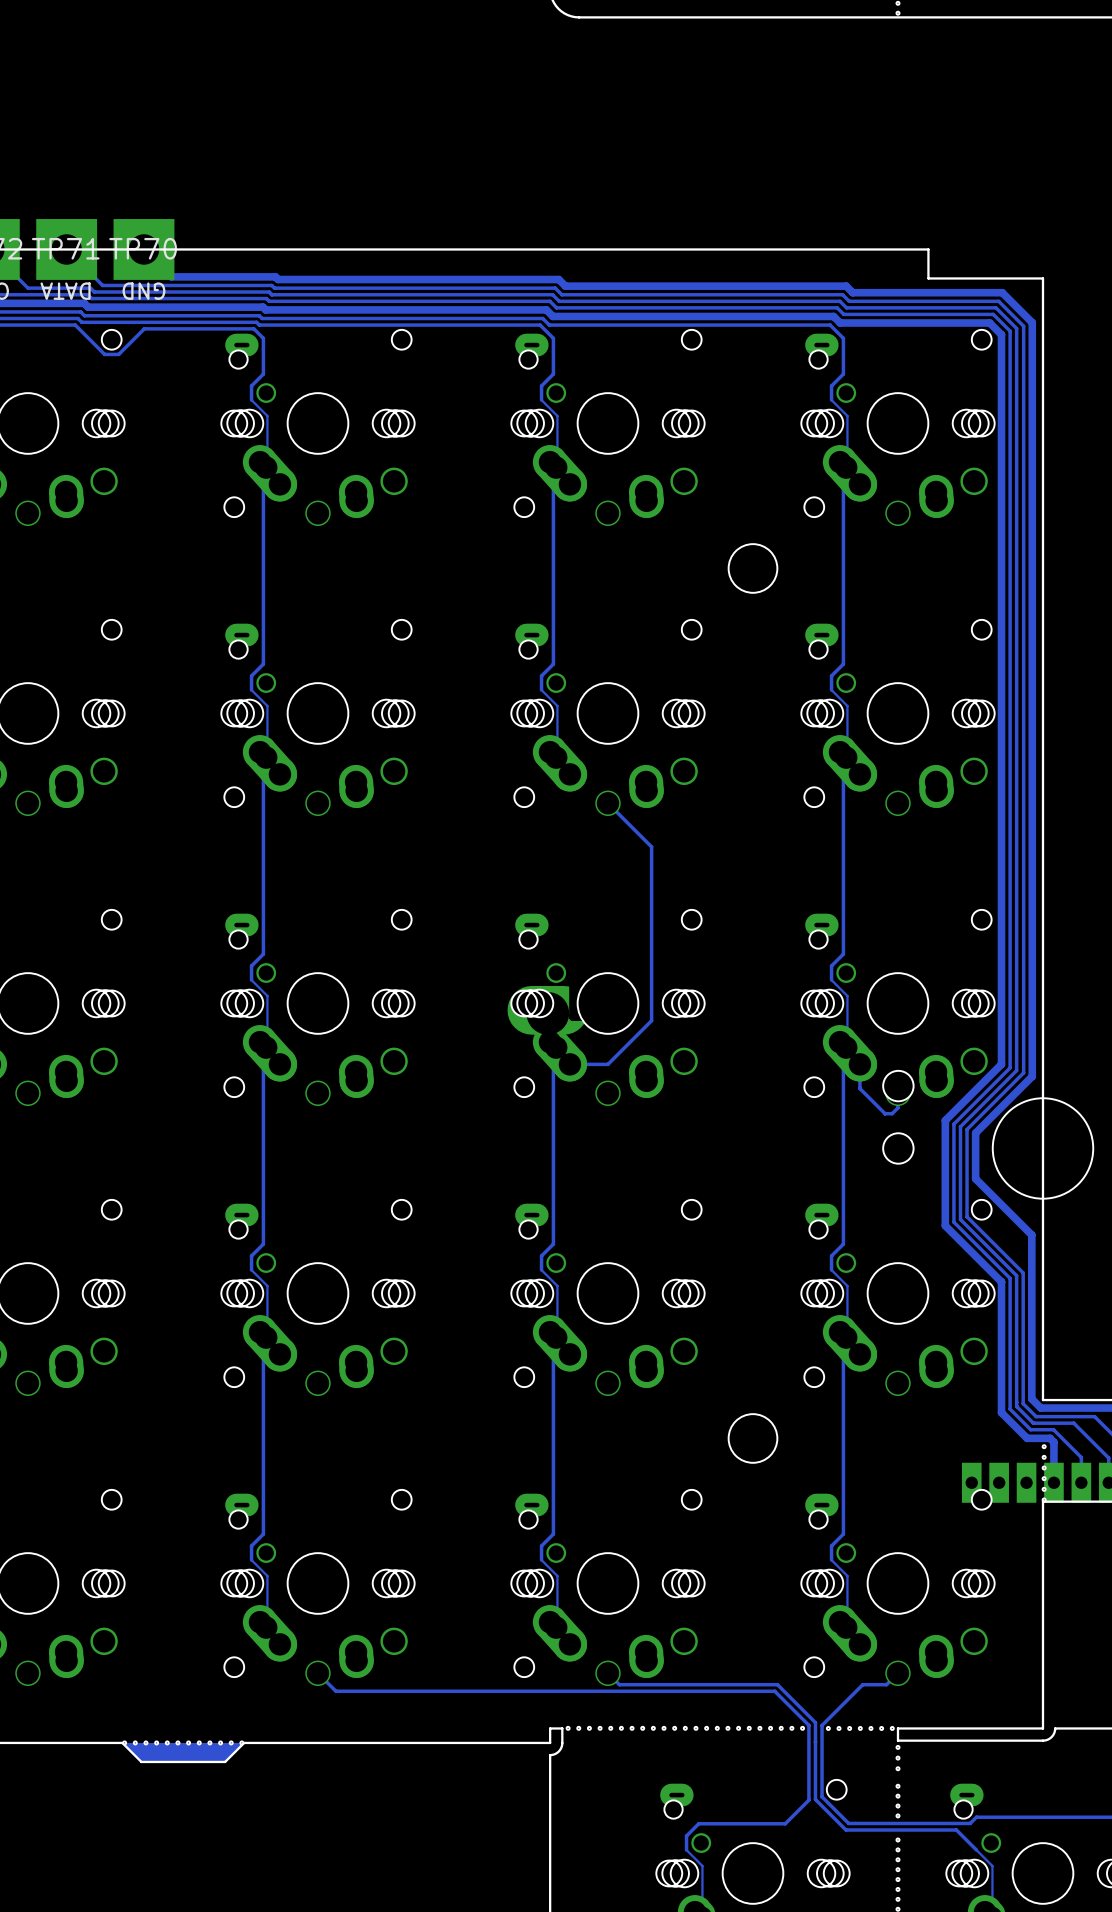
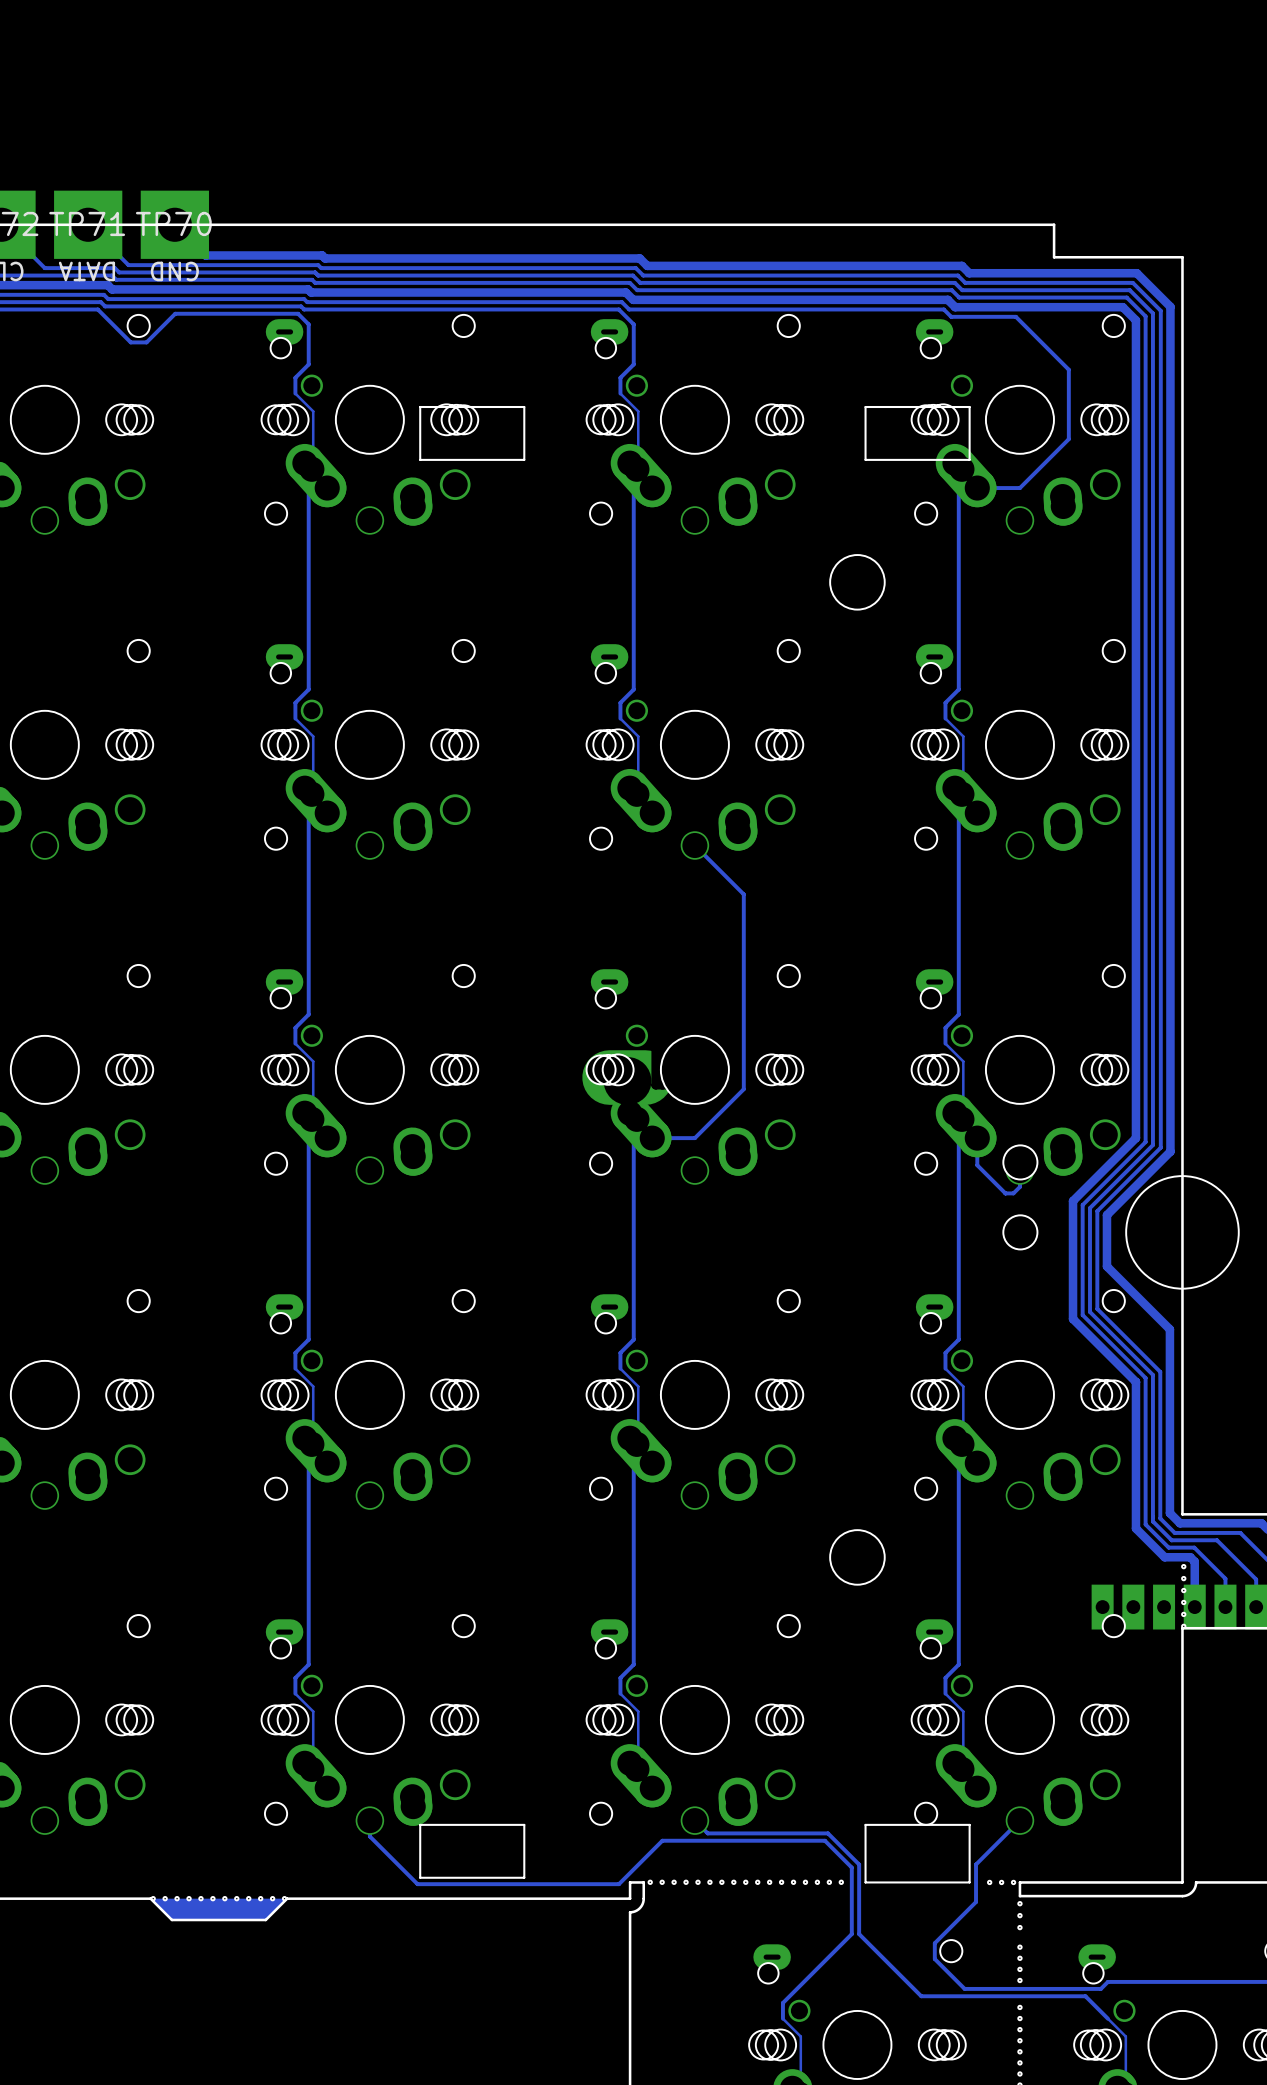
track: (836, 331) (843, 338) (843, 374) (831, 385) (831, 400) (847, 415) (847, 471) -> (951, 316) (1015, 316) (1068, 369) (1068, 439) (1019, 488) (977, 488)
drawing: none -> [419, 405, 971, 1884]
track: (317, 1673) (335, 1691) (578, 1691) -> (369, 1820) (369, 1836) (417, 1884) (618, 1884) (662, 1840)
track: (726, 1684) (777, 1684) (815, 1722) (815, 1799) (845, 1830) -> (828, 1833) (859, 1864) (859, 1934) (921, 1996) (961, 1996)
track: (886, 1684) (862, 1684) (822, 1725) (822, 1782) -> (1007, 1833) (976, 1864) (976, 1902) (934, 1943)
track: (724, 1691) (774, 1691) (808, 1725) (808, 1800) (785, 1823) (698, 1823) -> (824, 1840) (851, 1867) (851, 1934) (796, 1989)
part: (749, 1728) -> none
part: (759, 1728) -> none
part: (770, 1728) -> none
part: (781, 1728) -> none
part: (791, 1728) -> none
part: (802, 1728) -> none
part: (828, 1728) -> none
part: (839, 1728) -> none
part: (849, 1728) -> none
part: (860, 1728) -> none

